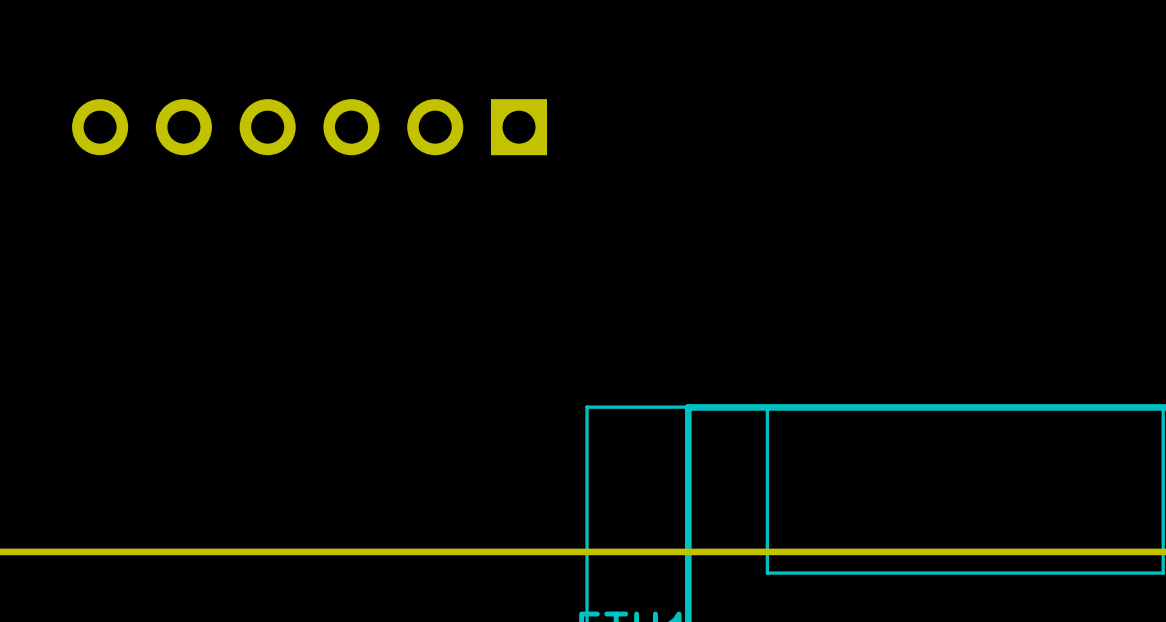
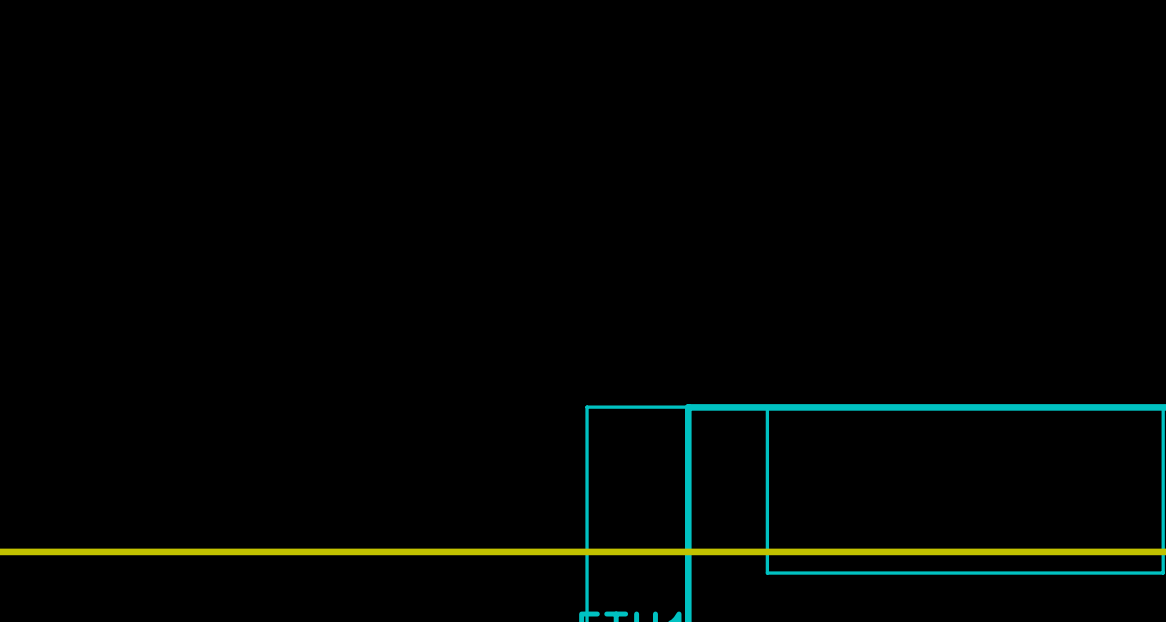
part: (309, 127) -> none

